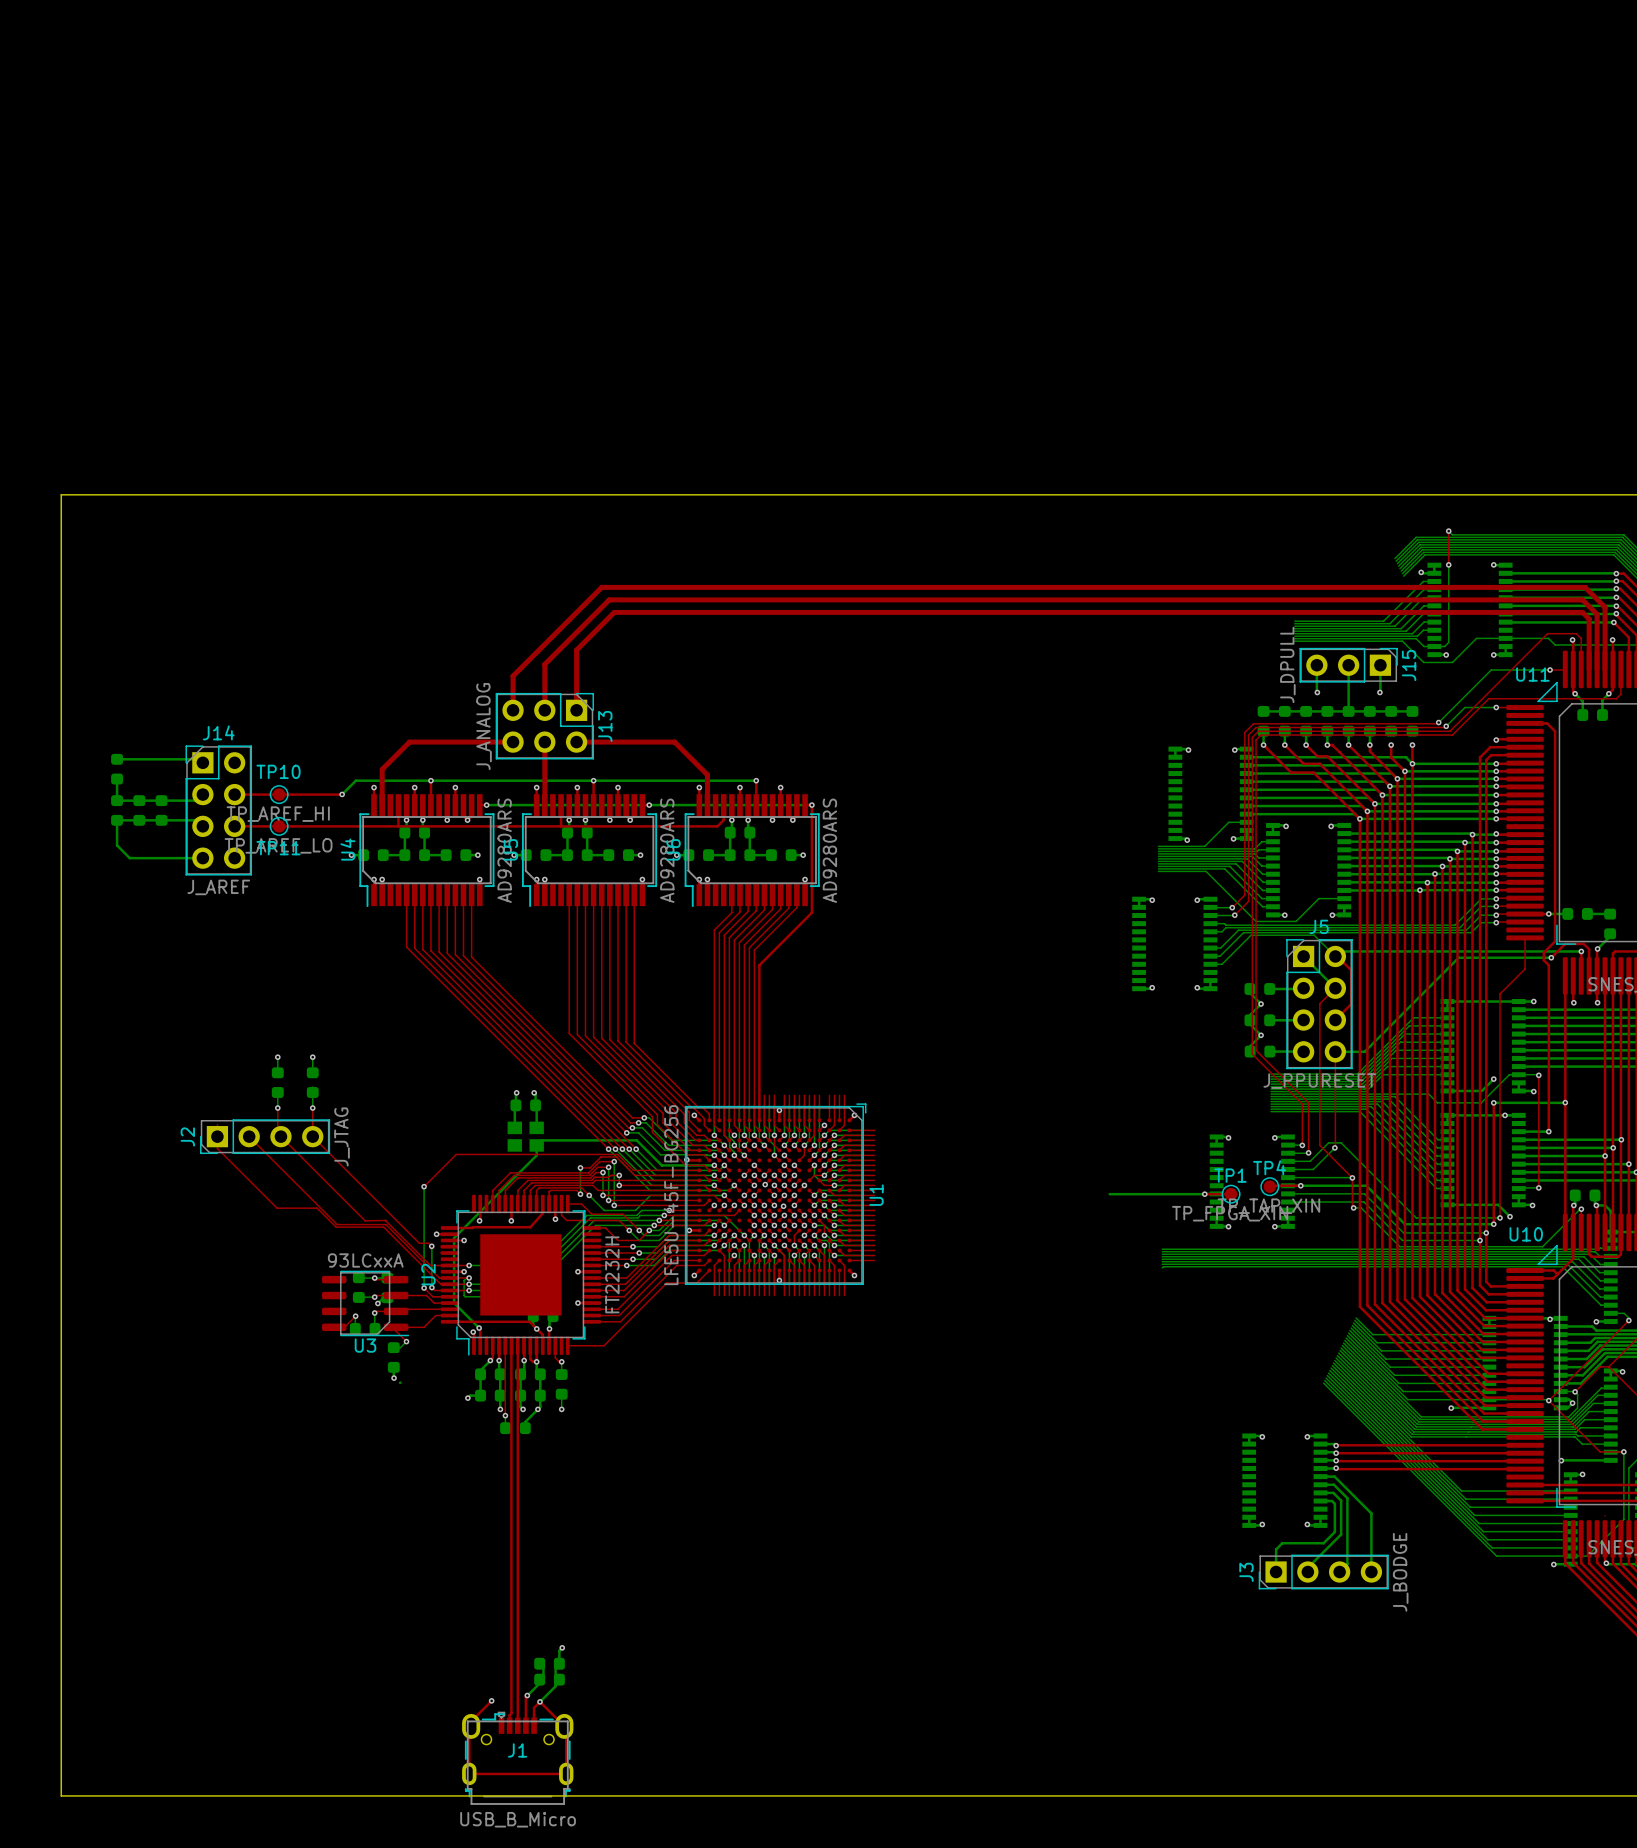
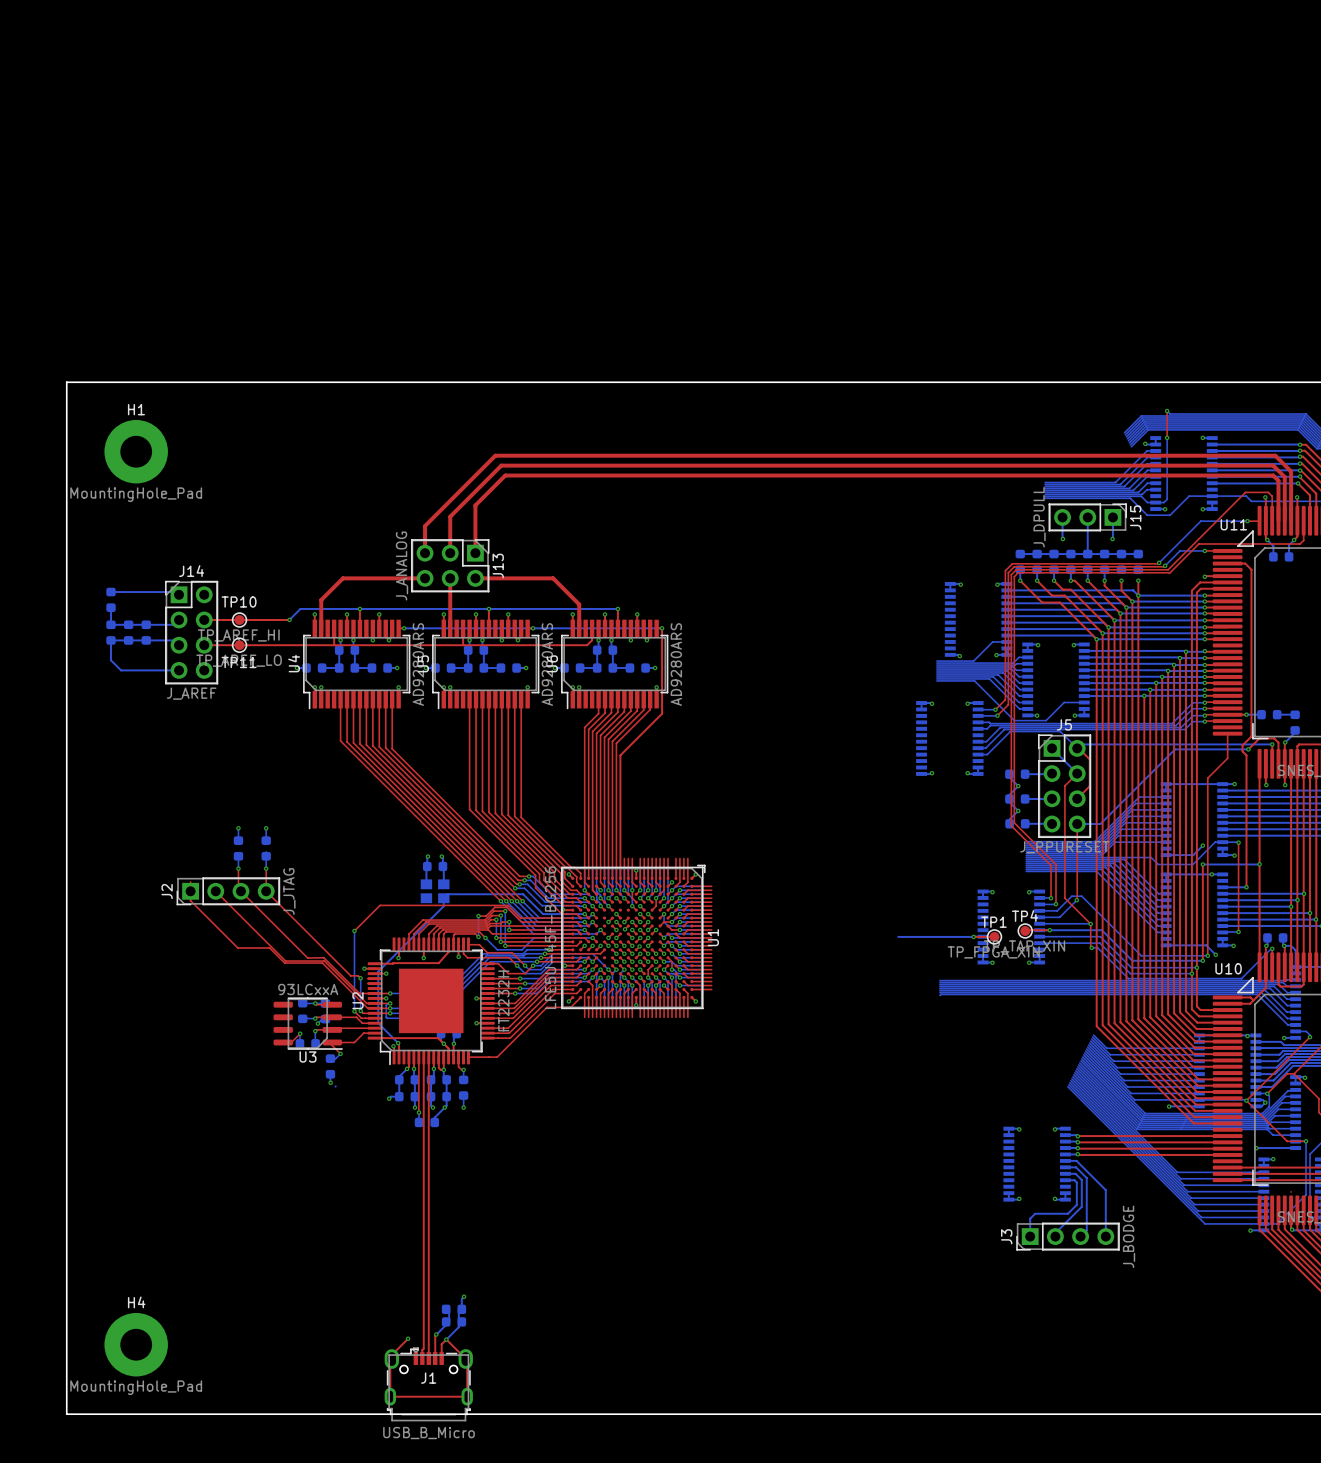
H1: none -> MountingHole_Pad (136, 451)
H4: none -> MountingHole_Pad (136, 1344)

